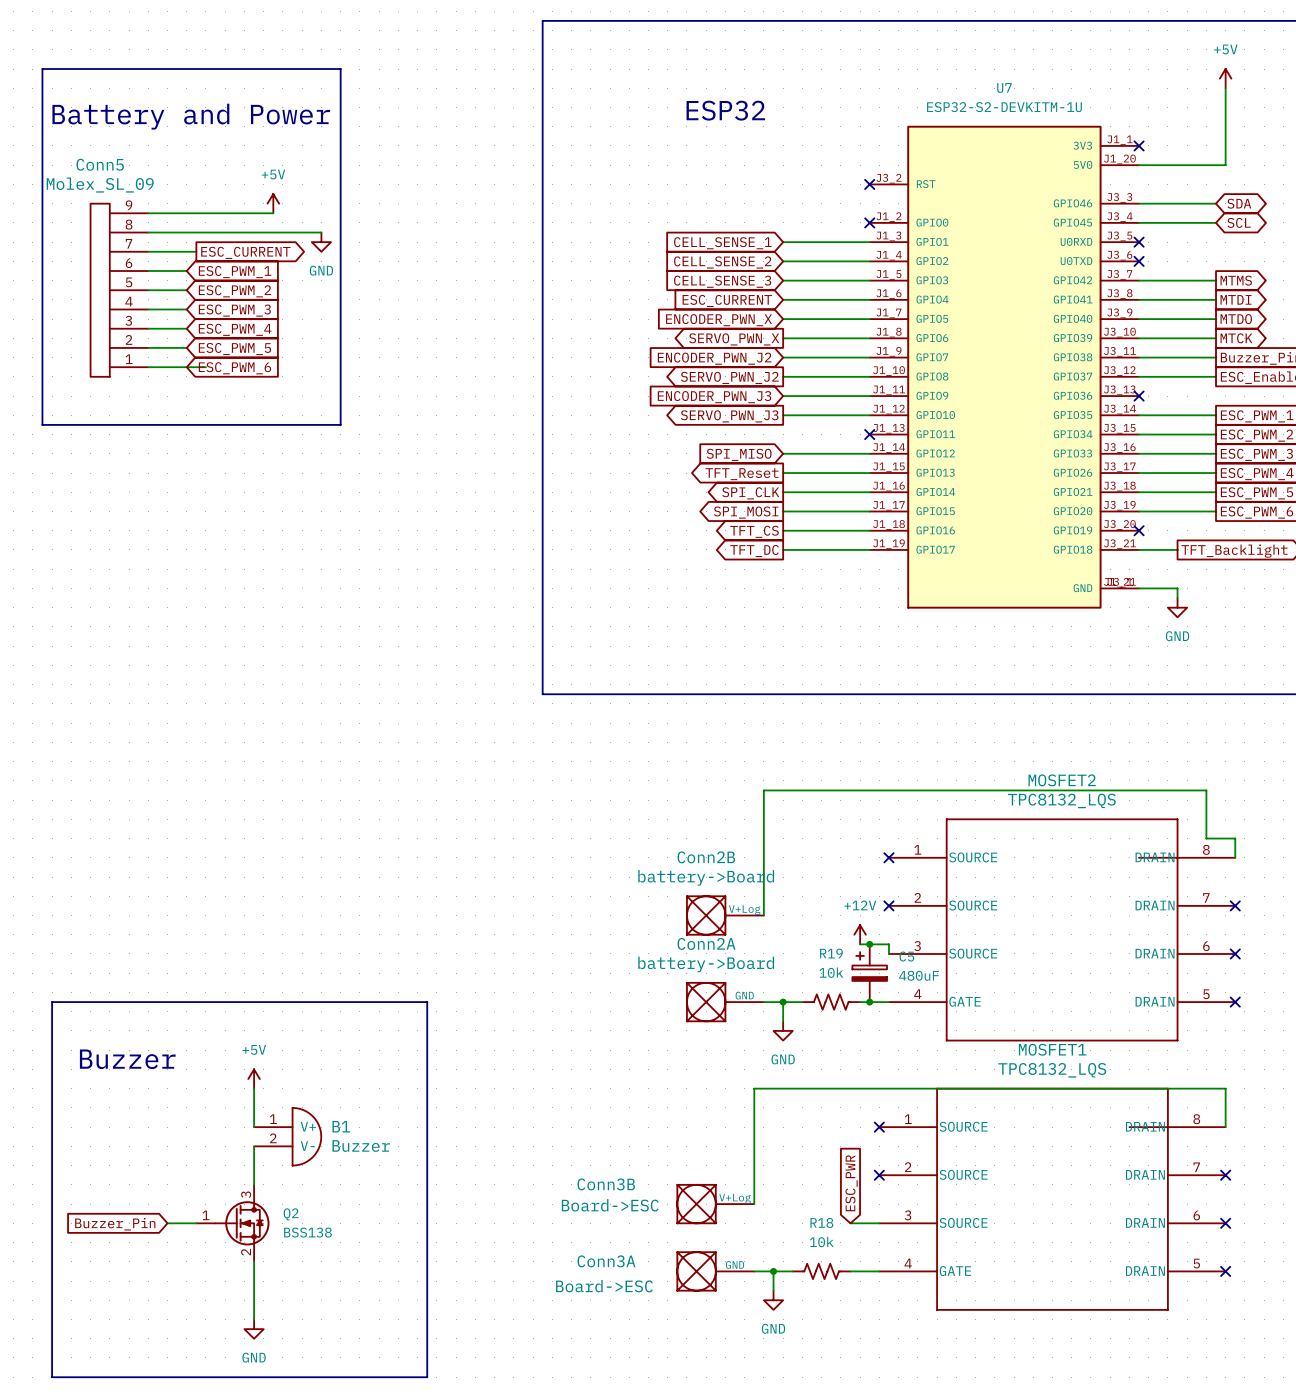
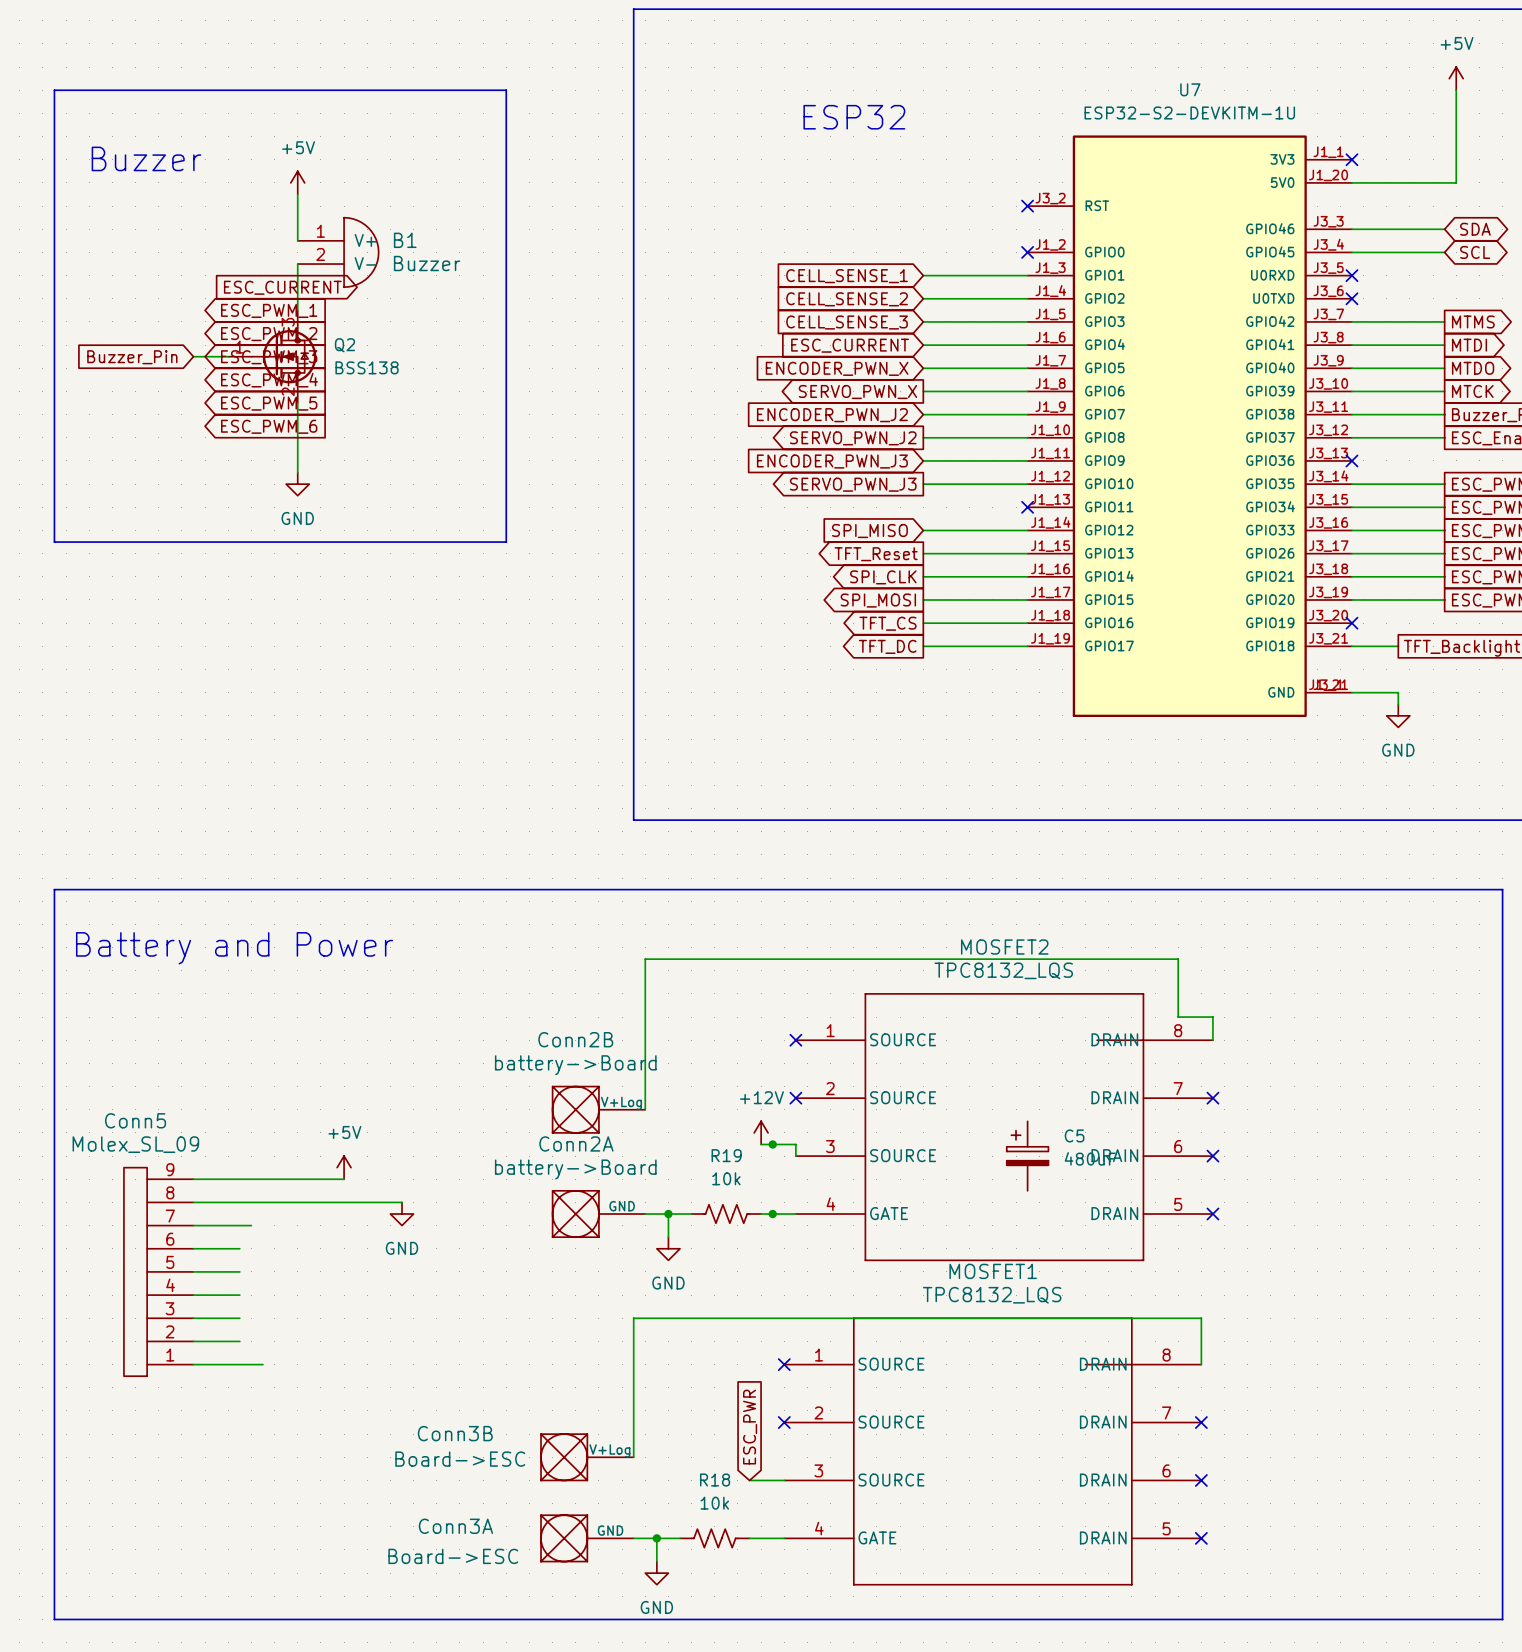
line: (42, 69) (340, 69) (340, 424) (42, 424) (42, 69) -> (54, 90) (54, 542) (506, 542) (506, 90) (54, 90)
text: Battery and Power (191, 116) -> none
text: none -> Buzzer (146, 158)
wire: none -> (297, 194) (297, 240)
power symbol position: +5V (273, 203) -> +5V (297, 182)
wire: (148, 213) (273, 213) -> none
wire: (148, 232) (321, 232) -> none
wire: none -> (297, 264) (297, 310)
power symbol position: GND (321, 242) -> GND (297, 484)
wire: (148, 251) (196, 251) -> none
wire: (148, 271) (186, 271) -> none
Conn5 position: (119, 290) -> (158, 1271)
wire: (148, 290) (186, 290) -> none
wire: (148, 309) (177, 309) -> none
wire: none -> (205, 356) (228, 356)
global label: none -> Buzzer_Pin (132, 357)
wire: (148, 328) (186, 328) -> none
wire: (148, 347) (186, 347) -> none
wire: none -> (297, 403) (297, 472)
wire: (148, 367) (205, 367) -> none
line: none -> (54, 889) (1502, 889) (1502, 1619) (54, 1619) (54, 889)
text: none -> Battery and Power (234, 948)
no-connect mark: (888, 857) -> none
wire: (1235, 857) (1235, 838) (1206, 838) (1206, 790) (763, 790) (763, 915) -> none
no-connect mark: none -> (795, 1040)
wire: none -> (1212, 1040) (1212, 1017) (1178, 1017) (1178, 959) (645, 959) (645, 1109)
no-connect mark: (888, 905) -> none
no-connect mark: (1235, 905) -> none
Conn2B position: (725, 915) -> (598, 1109)
no-connect mark: none -> (795, 1098)
no-connect mark: none -> (1212, 1098)
MOSFET2 position: (1062, 929) -> (1004, 1127)
power symbol: +12V (860, 934) -> none
wire: (860, 944) (888, 944) (888, 953) -> none
junction: (869, 944) -> none
power symbol: none -> +12V (761, 1132)
no-connect mark: (1235, 953) -> none
wire: none -> (761, 1144) (795, 1144) (795, 1156)
junction: none -> (772, 1144)
no-connect mark: none -> (1212, 1156)
wire: none -> (193, 1179) (344, 1179)
line: (52, 1002) (427, 1002) (427, 1377) (52, 1377) (52, 1002) -> none
Conn2A position: (725, 1002) -> (598, 1214)
wire: (763, 1002) (802, 1002) -> none
wire: (783, 1002) (783, 1021) -> none
junction: (783, 1002) -> none
R19 position: (831, 1002) -> (726, 1214)
wire: (860, 1002) (888, 1002) -> none
junction: (869, 1002) -> none
no-connect mark: (1235, 1002) -> none
wire: none -> (193, 1202) (401, 1202)
power symbol: none -> GND (401, 1214)
wire: none -> (645, 1214) (691, 1214)
wire: none -> (668, 1214) (668, 1237)
junction: none -> (668, 1214)
wire: none -> (761, 1214) (795, 1214)
junction: none -> (772, 1214)
no-connect mark: none -> (1212, 1214)
wire: none -> (193, 1225) (251, 1225)
power symbol: GND (783, 1030) -> none
wire: none -> (193, 1248) (239, 1248)
power symbol: none -> GND (668, 1248)
text: Buzzer (127, 1059) -> none
wire: none -> (193, 1271) (239, 1271)
power symbol position: +5V (254, 1079) -> +5V (344, 1167)
wire: none -> (193, 1295) (239, 1295)
wire: (254, 1088) (254, 1127) -> none
wire: none -> (193, 1318) (239, 1318)
wire: none -> (193, 1341) (239, 1341)
no-connect mark: (879, 1127) -> none
wire: (1225, 1127) (1225, 1088) (754, 1088) (754, 1204) -> none
B1 position: (287, 1136) -> (338, 252)
wire: none -> (193, 1364) (262, 1364)
wire: (254, 1146) (254, 1184) -> none
no-connect mark: none -> (784, 1364)
wire: none -> (1201, 1364) (1201, 1318) (633, 1318) (633, 1457)
no-connect mark: (879, 1175) -> none
no-connect mark: (1225, 1175) -> none
global label: ESC_PWR (851, 1183) -> none
no-connect mark: none -> (784, 1422)
no-connect mark: none -> (1201, 1422)
MOSFET1 position: (1052, 1199) -> (992, 1451)
global label: none -> ESC_PWR (750, 1427)
Conn3B position: (715, 1204) -> (587, 1457)
wire: (167, 1223) (196, 1223) -> none
Q2 position: (232, 1223) -> (272, 356)
wire: (850, 1223) (879, 1223) -> none
no-connect mark: (1225, 1223) -> none
global label: Buzzer_Pin (115, 1224) -> none
wire: none -> (749, 1480) (784, 1480)
no-connect mark: none -> (1201, 1480)
wire: (254, 1261) (254, 1319) -> none
Conn3A position: (715, 1271) -> (587, 1538)
wire: (754, 1271) (792, 1271) -> none
wire: (773, 1271) (773, 1290) -> none
junction: (773, 1271) -> none
R18 position: (821, 1271) -> (714, 1538)
wire: (850, 1271) (879, 1271) -> none
no-connect mark: (1225, 1271) -> none
wire: none -> (633, 1538) (680, 1538)
wire: none -> (656, 1538) (656, 1561)
junction: none -> (656, 1538)
wire: none -> (749, 1538) (784, 1538)
no-connect mark: none -> (1201, 1538)
power symbol: GND (773, 1300) -> none
power symbol: none -> GND (656, 1573)
power symbol: GND (254, 1329) -> none

